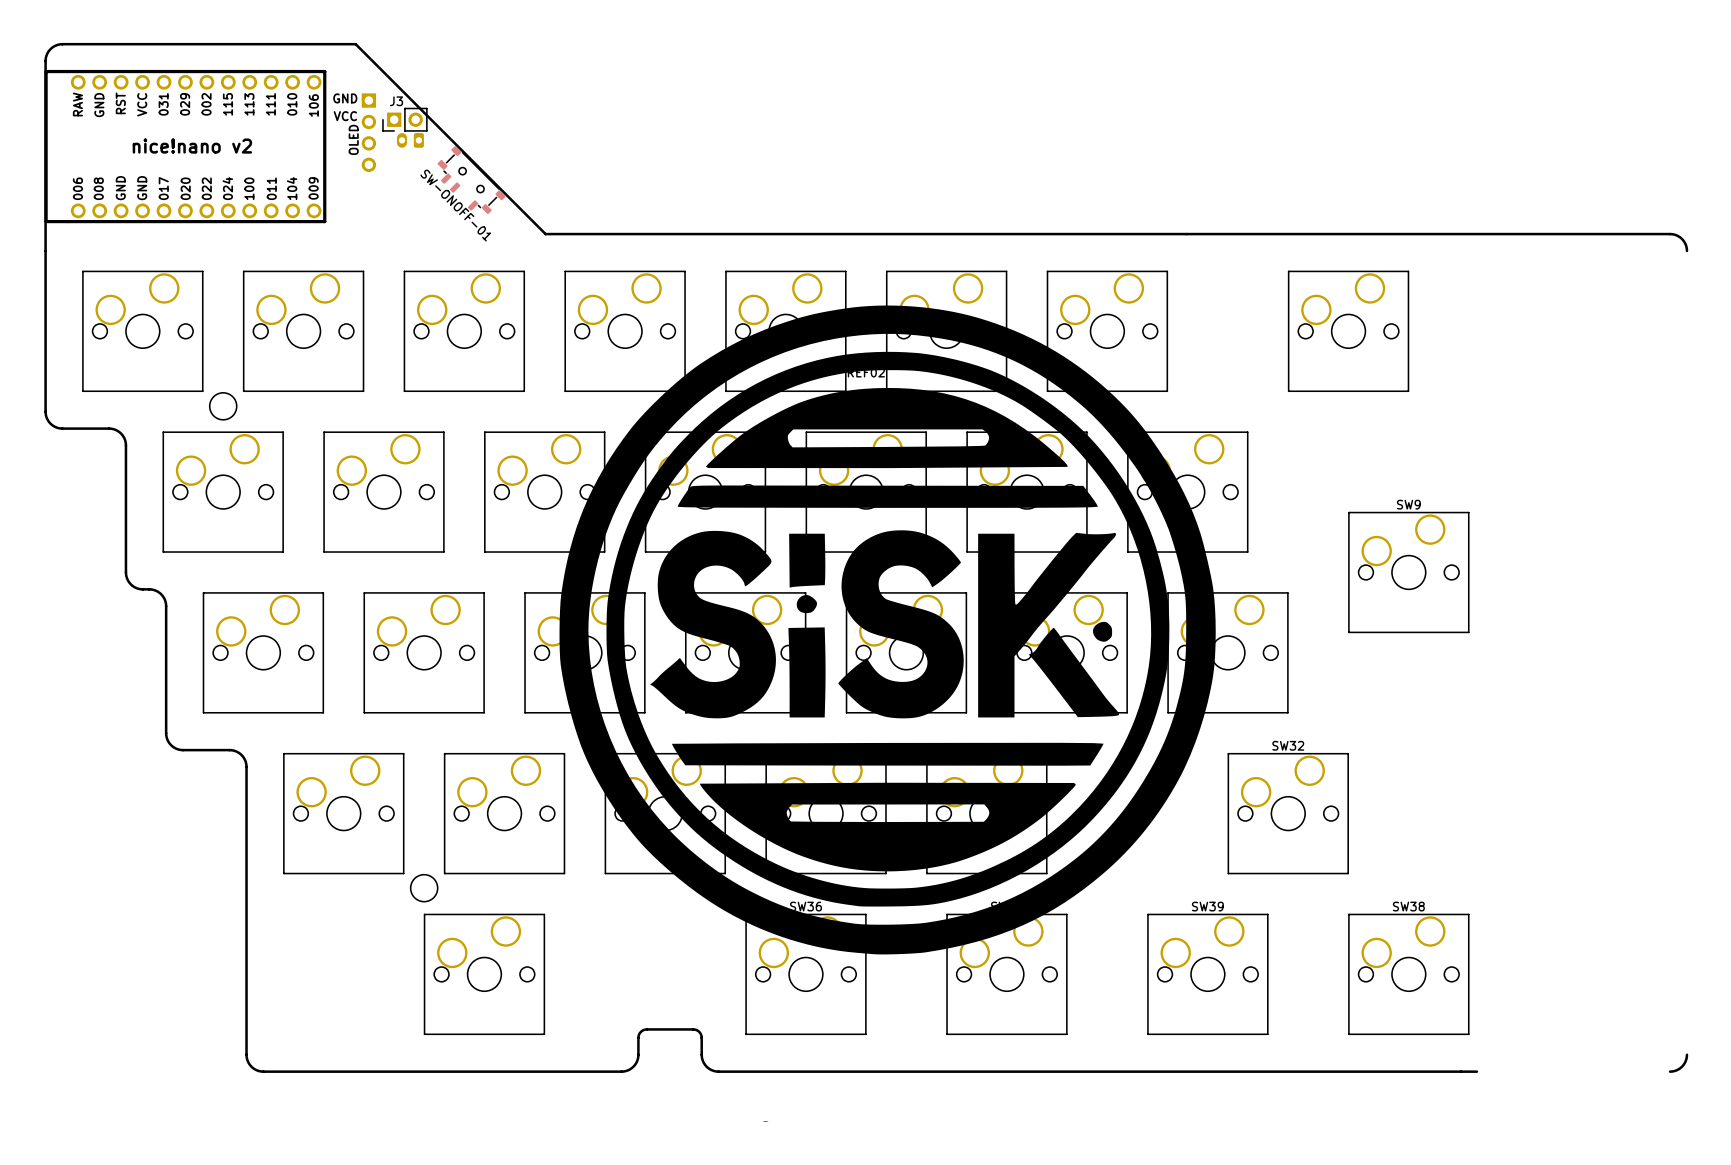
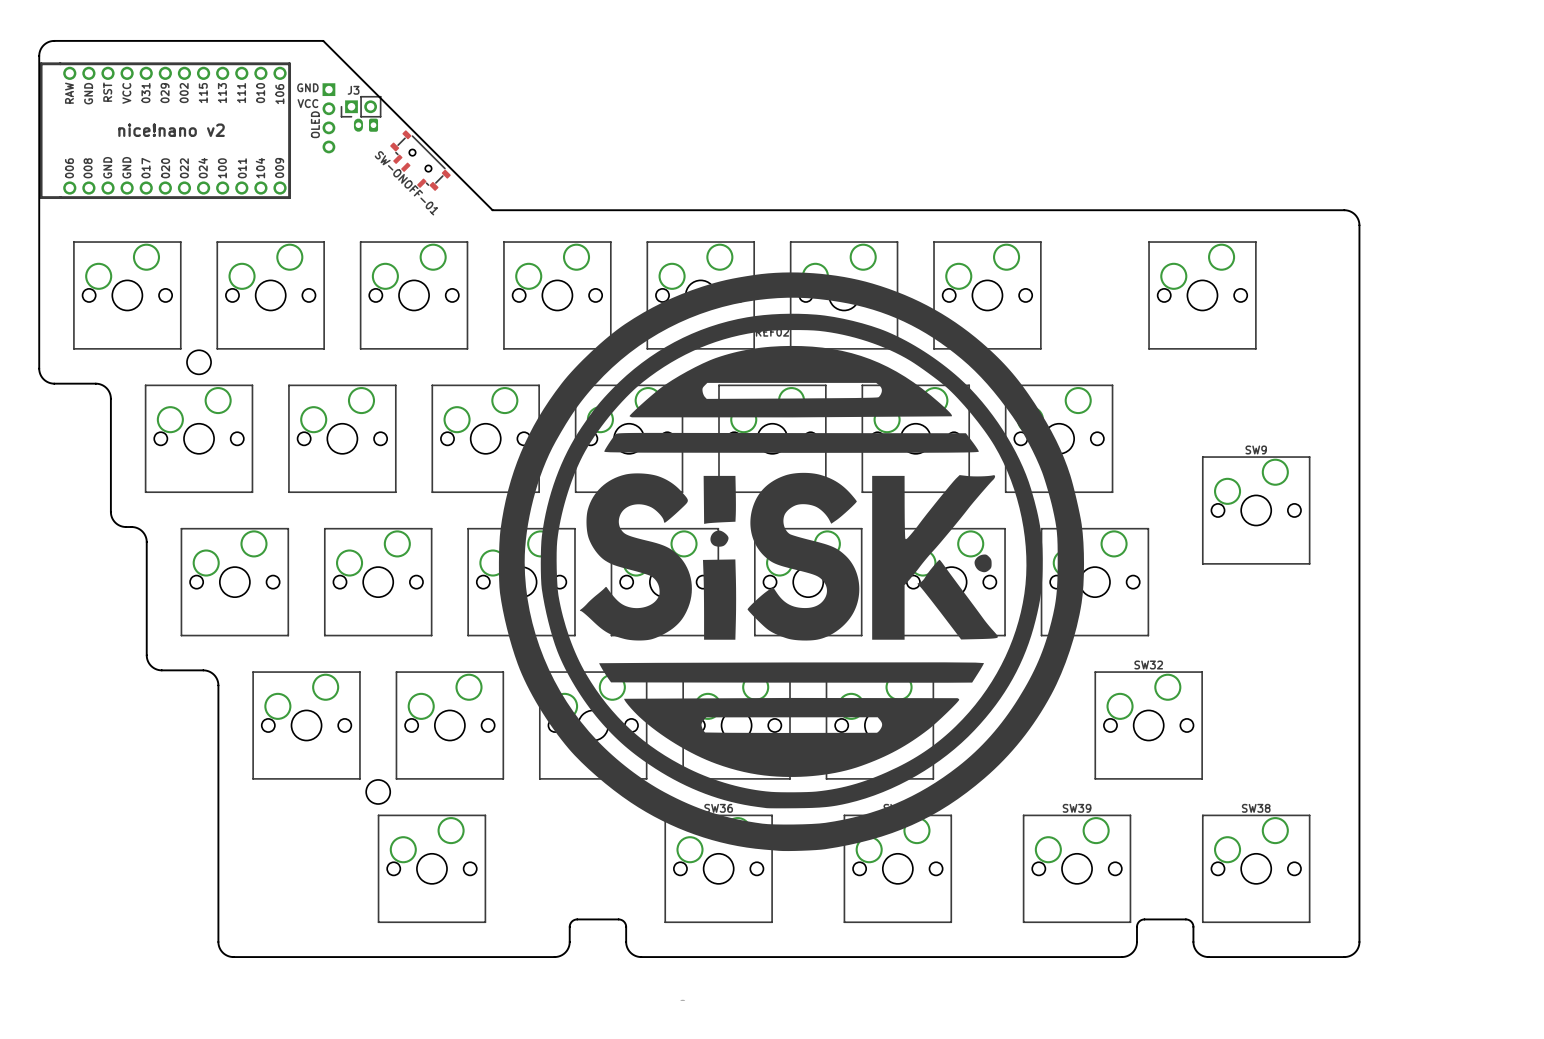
board edge: none -> (54, 40) (323, 40) (492, 210) (1344, 210) (1353, 213) (1358, 219) (1359, 225) (1359, 942) (1357, 950) (1352, 954) (1344, 957) (1206, 956) (1199, 953) (1194, 947) (1193, 925) (1189, 920) (1144, 919) (1139, 920) (1137, 925) (1136, 943) (1134, 950) (1129, 954) (1123, 956) (641, 957) (633, 954) (627, 948) (625, 925) (622, 920) (577, 919) (572, 920) (569, 925) (567, 949) (563, 953) (556, 956) (233, 957) (225, 954) (220, 950) (218, 942) (217, 680) (214, 674) (206, 670) (160, 670) (149, 663) (146, 655) (146, 538) (138, 528) (117, 524) (110, 513) (109, 392) (105, 386) (97, 383) (50, 383) (42, 377) (39, 370) (39, 55) (43, 45) (54, 40)
board edge: (1686, 250) (1682, 239) (1670, 234) (545, 234) (355, 44) (62, 44) (51, 47) (46, 57) (46, 415) (49, 422) (56, 427) (112, 429) (119, 432) (125, 439) (126, 574) (128, 581) (133, 586) (156, 591) (162, 595) (165, 602) (166, 733) (168, 742) (174, 747) (181, 750) (233, 750) (240, 753) (245, 761) (246, 1054) (248, 1062) (254, 1069) (263, 1071) (623, 1071) (631, 1068) (637, 1061) (638, 1036) (642, 1030) (693, 1029) (698, 1031) (701, 1035) (701, 1056) (703, 1063) (710, 1069) (718, 1071) (1476, 1071) -> none
board edge: (1686, 1054) (1682, 1066) (1670, 1071) -> none

